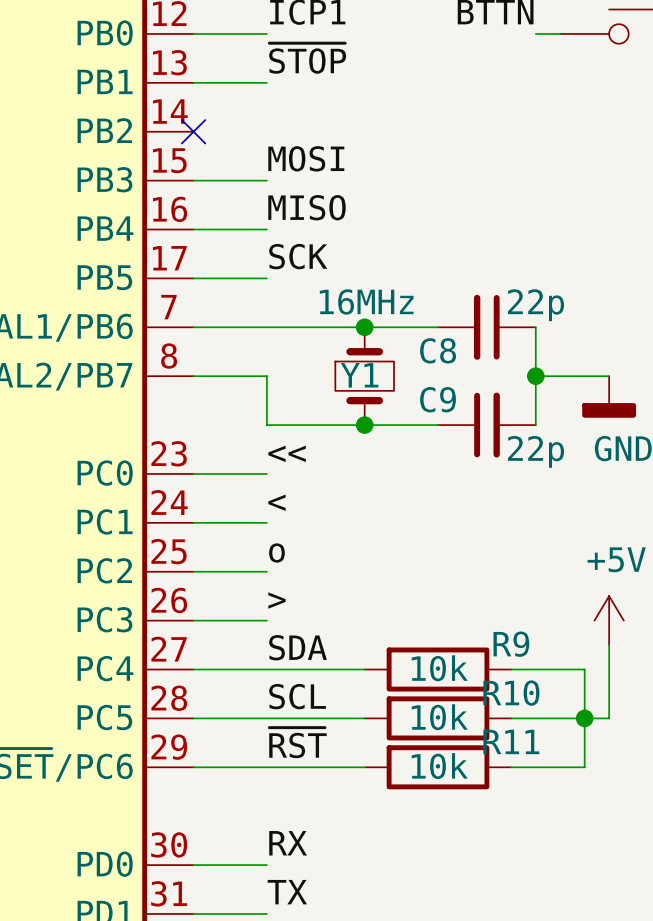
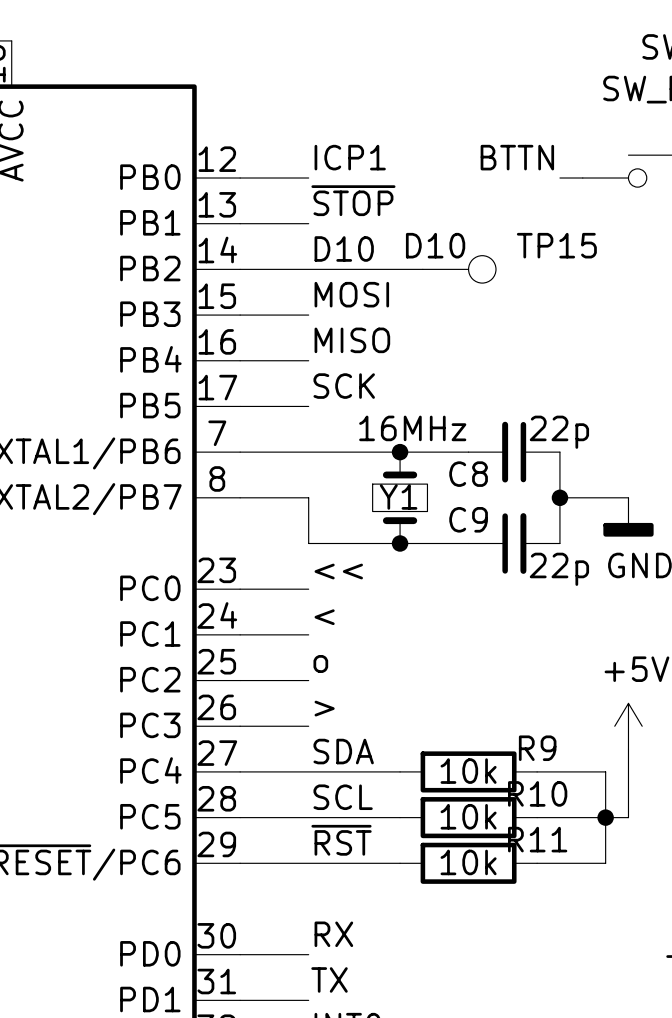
label: none -> D10 (344, 248)
wire: none -> (240, 269) (422, 269)
no-connect mark: (193, 131) -> none
TP15: none -> D10 (459, 269)

